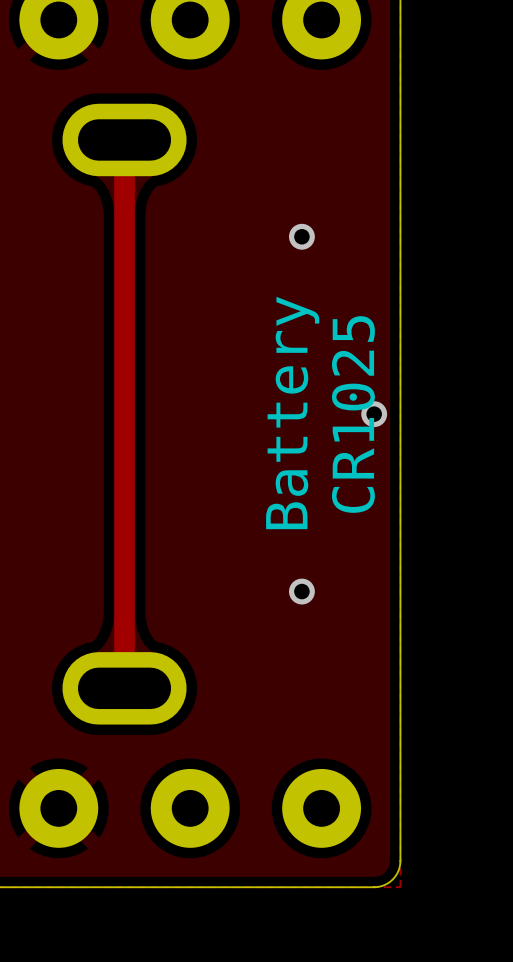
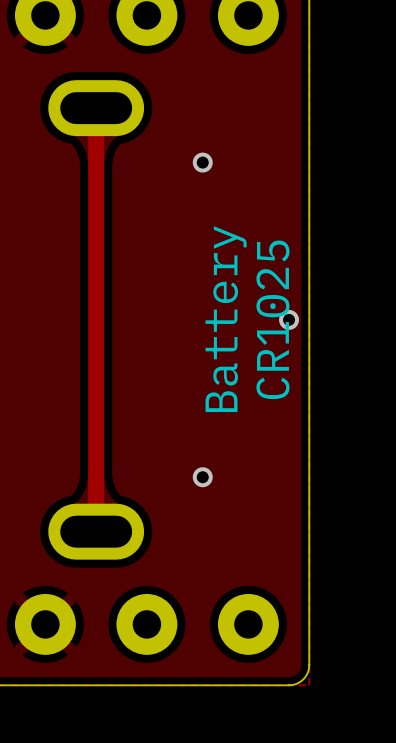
via position: (301, 236) -> (202, 162)
via position: (301, 591) -> (202, 477)

